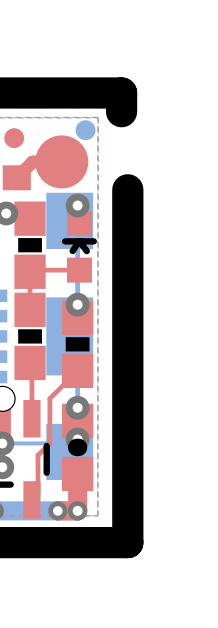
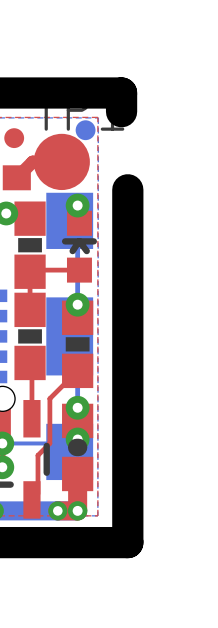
part: (61, 161) -> none
part: none -> (61, 161)

